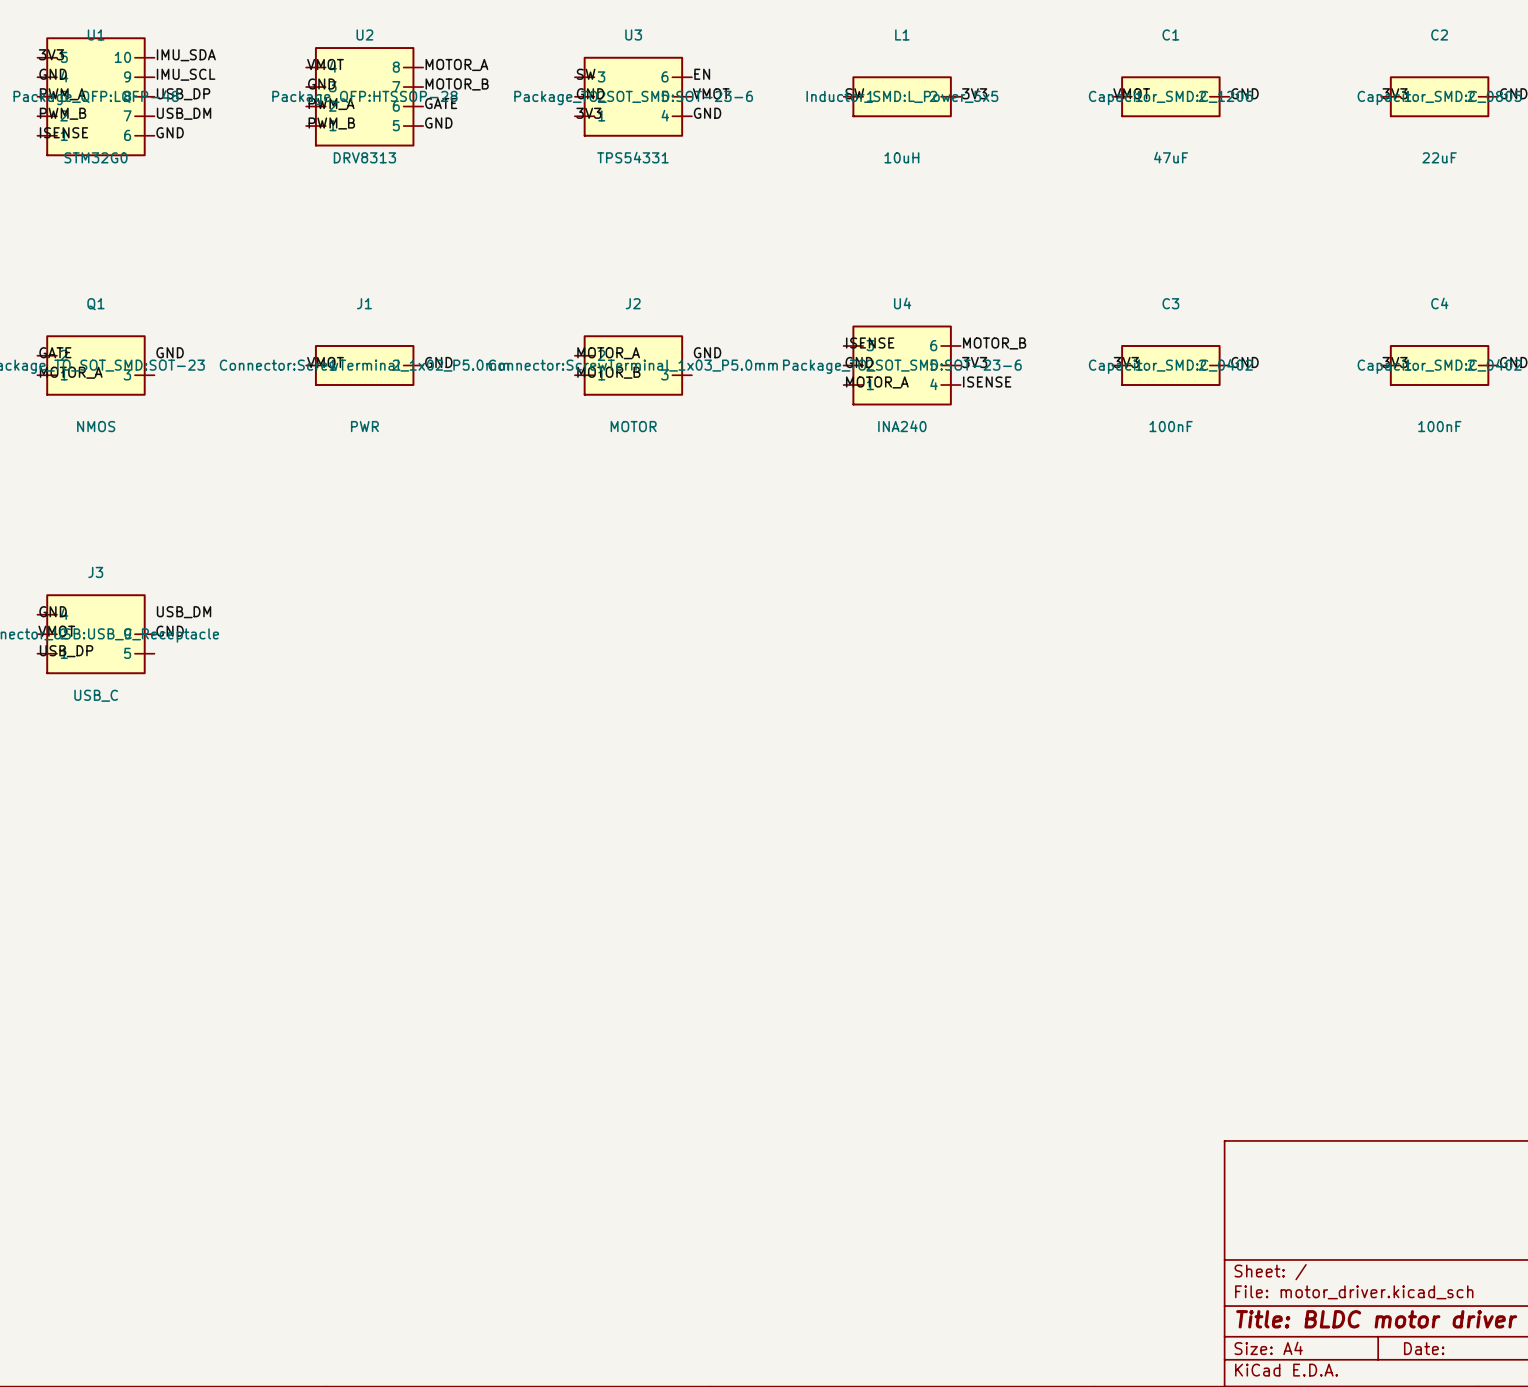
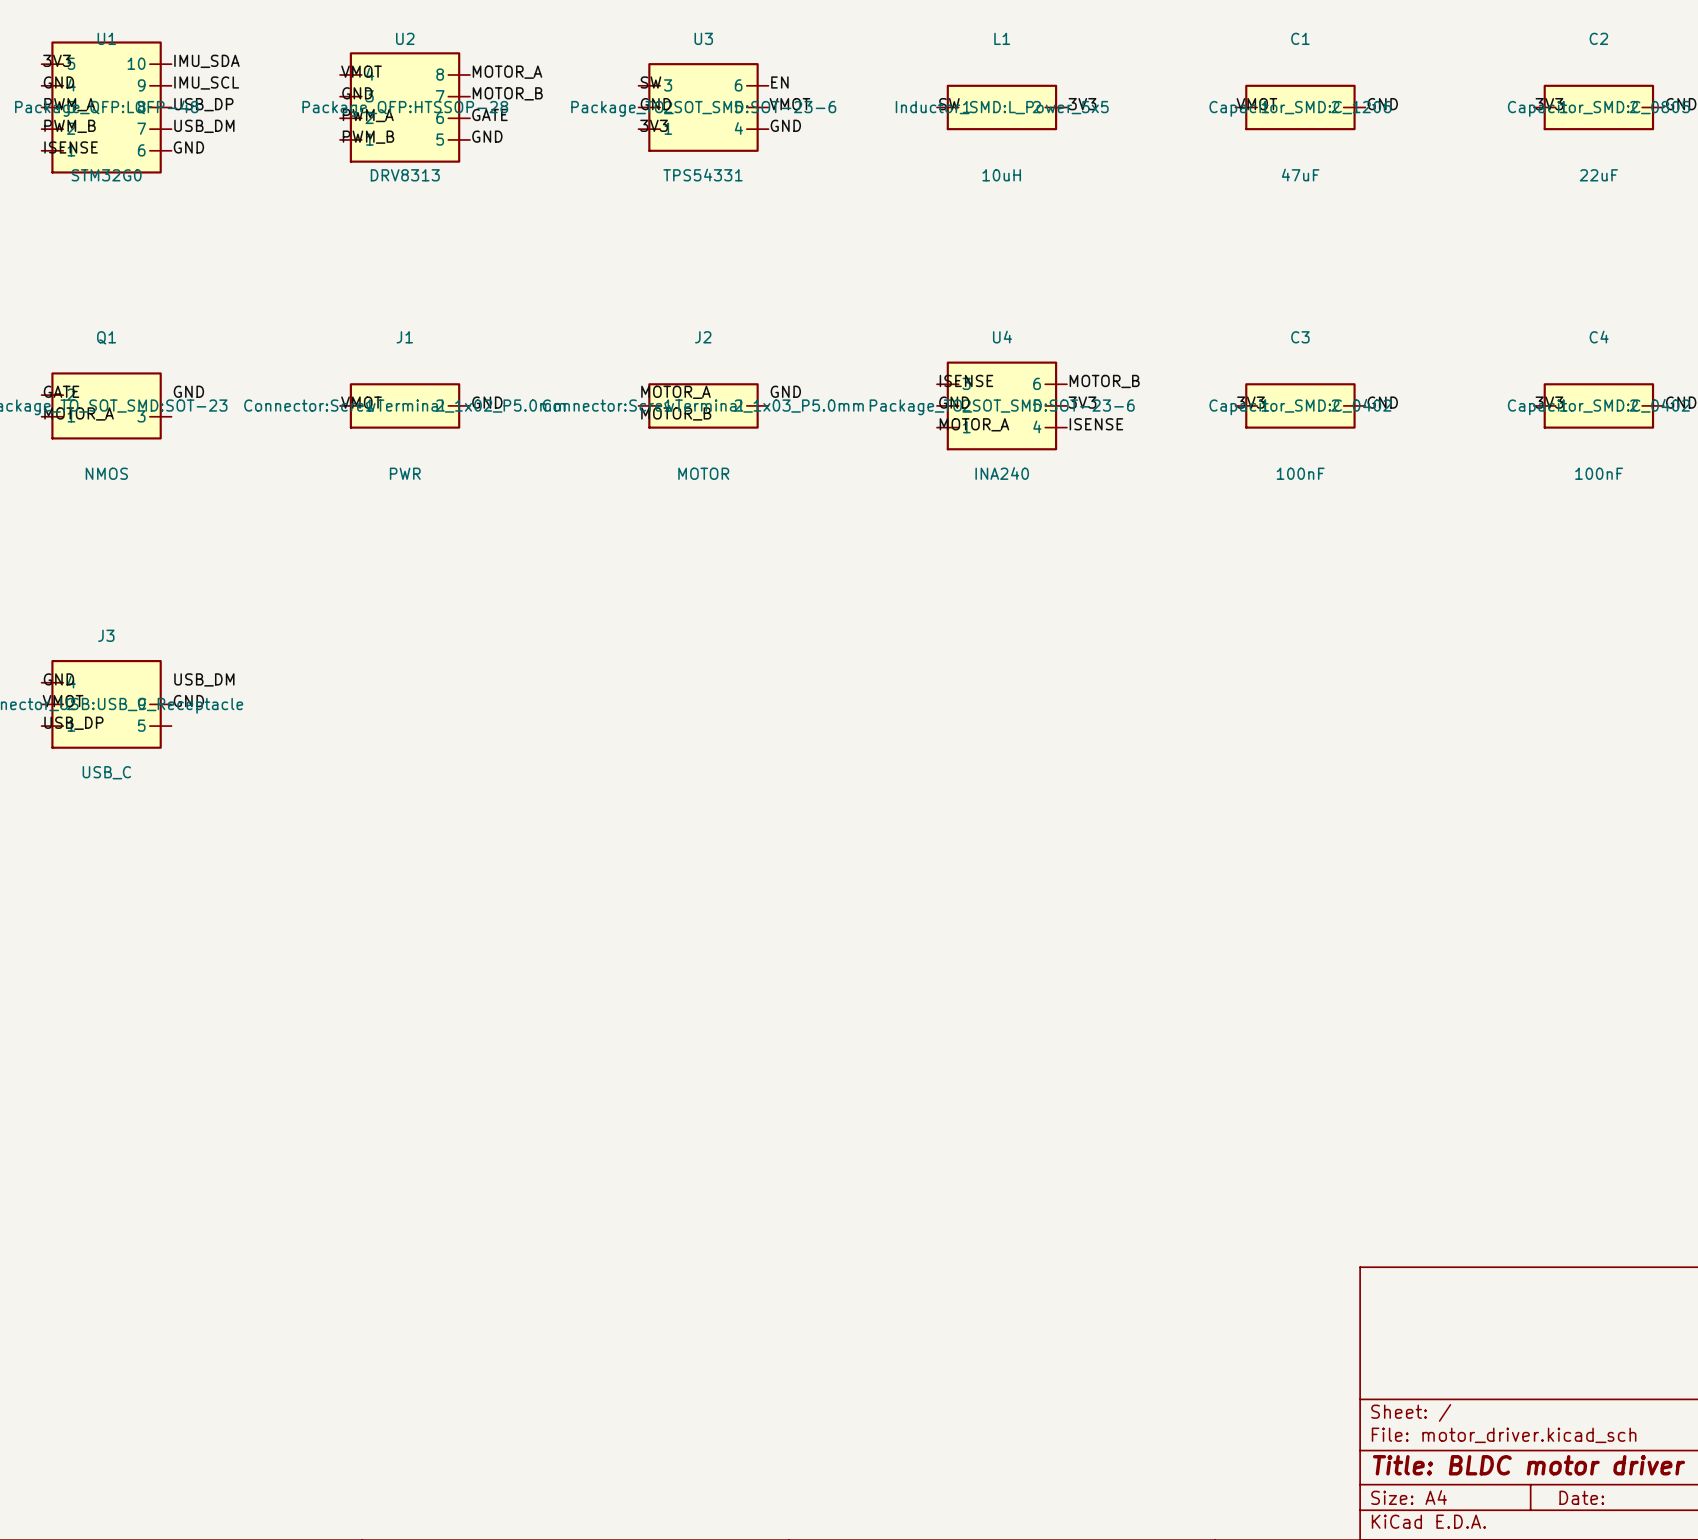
J2 symbol: [574, 335, 692, 396] -> [638, 383, 769, 429]

